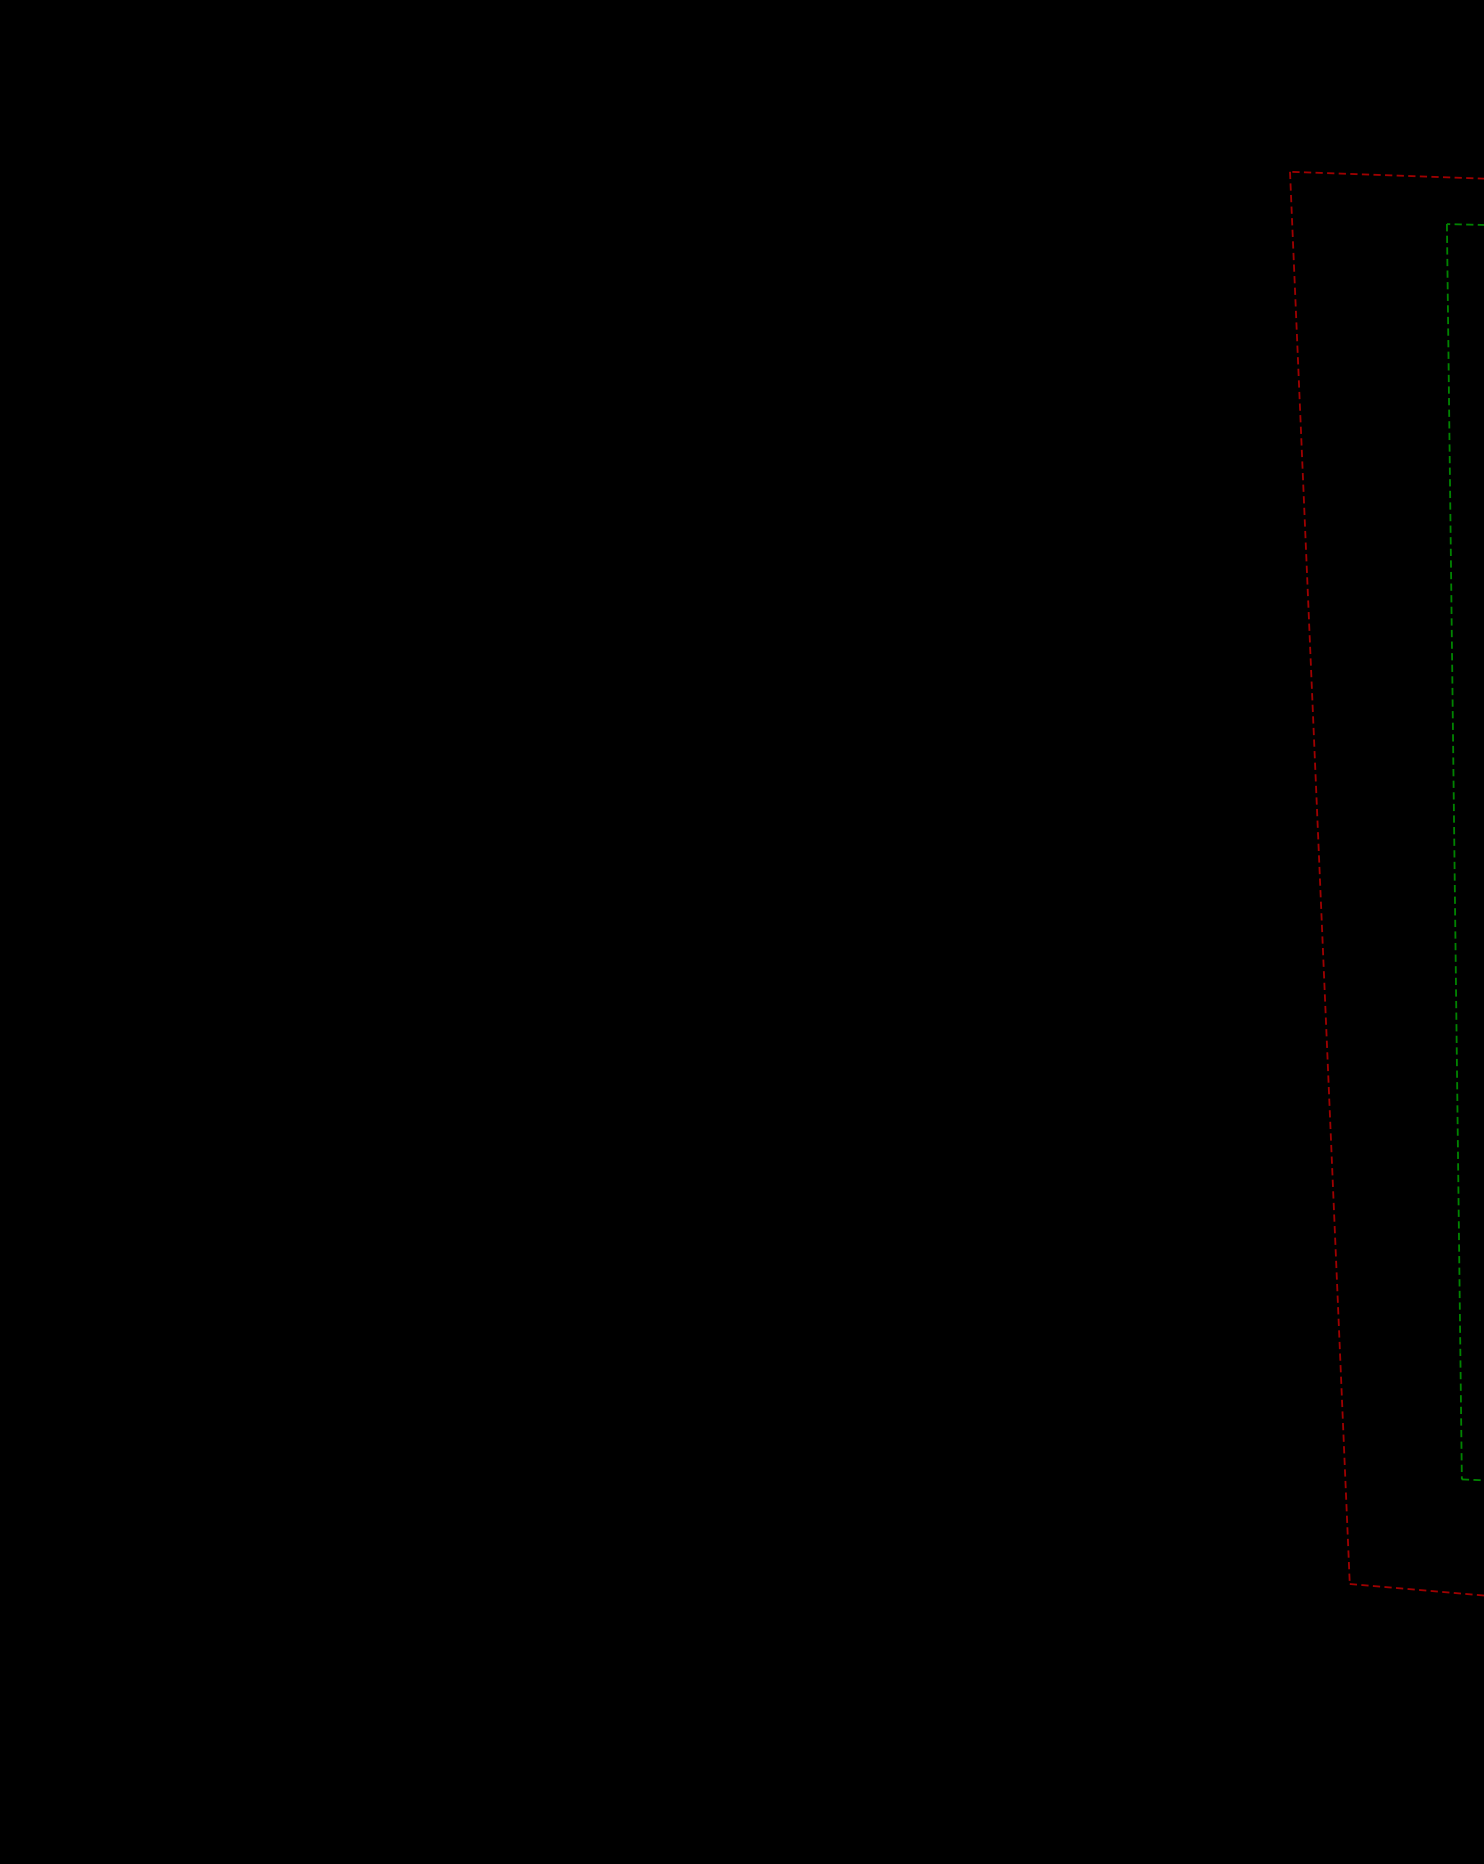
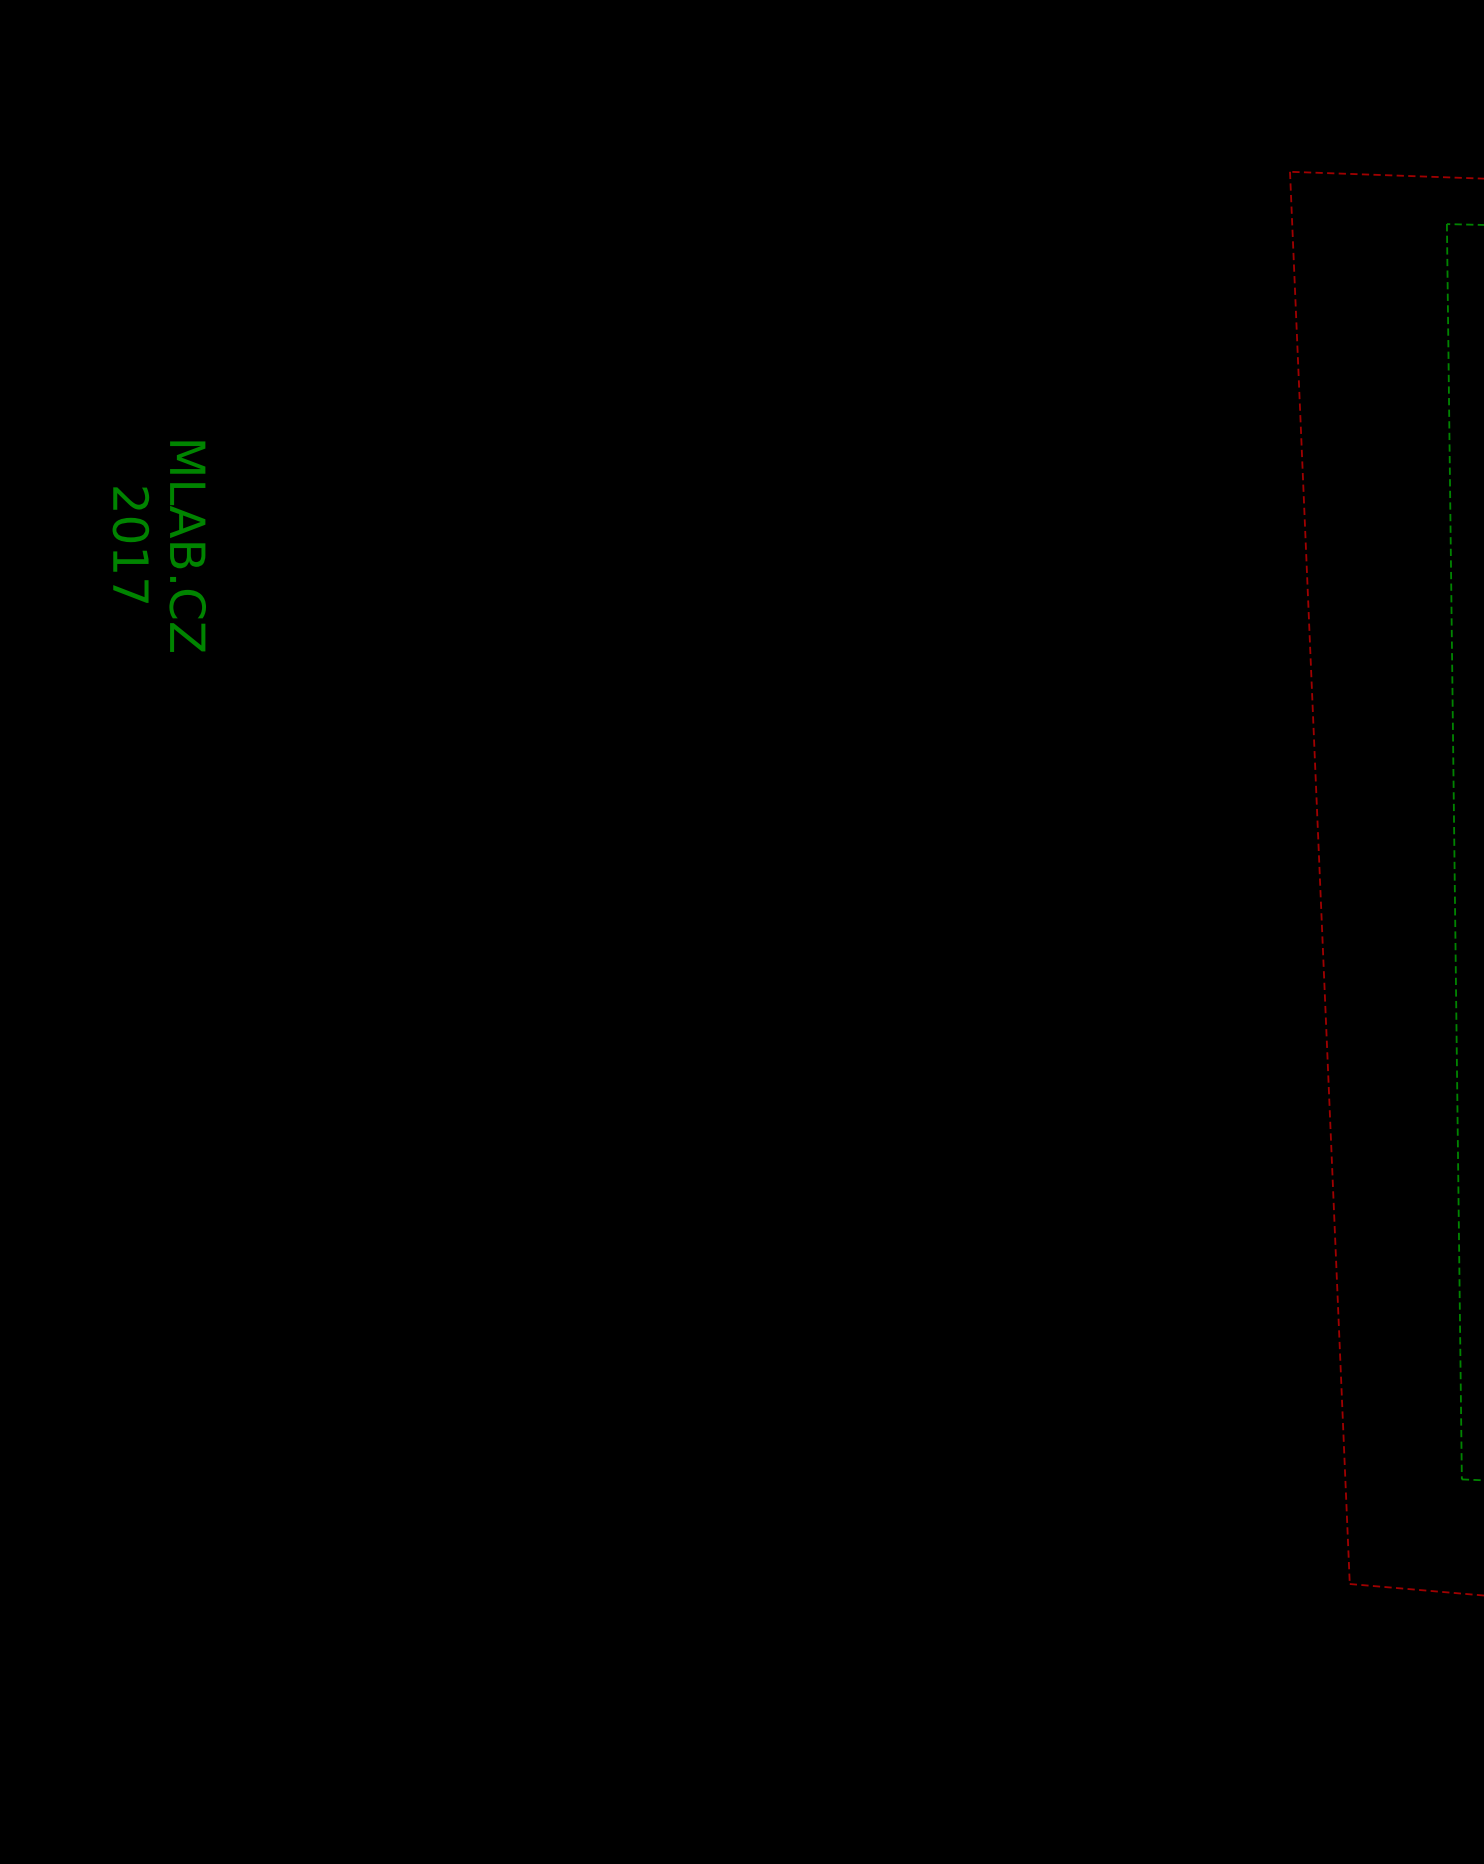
text: none -> 2017 (130, 545)
text: none -> MLAB.CZ (187, 546)

